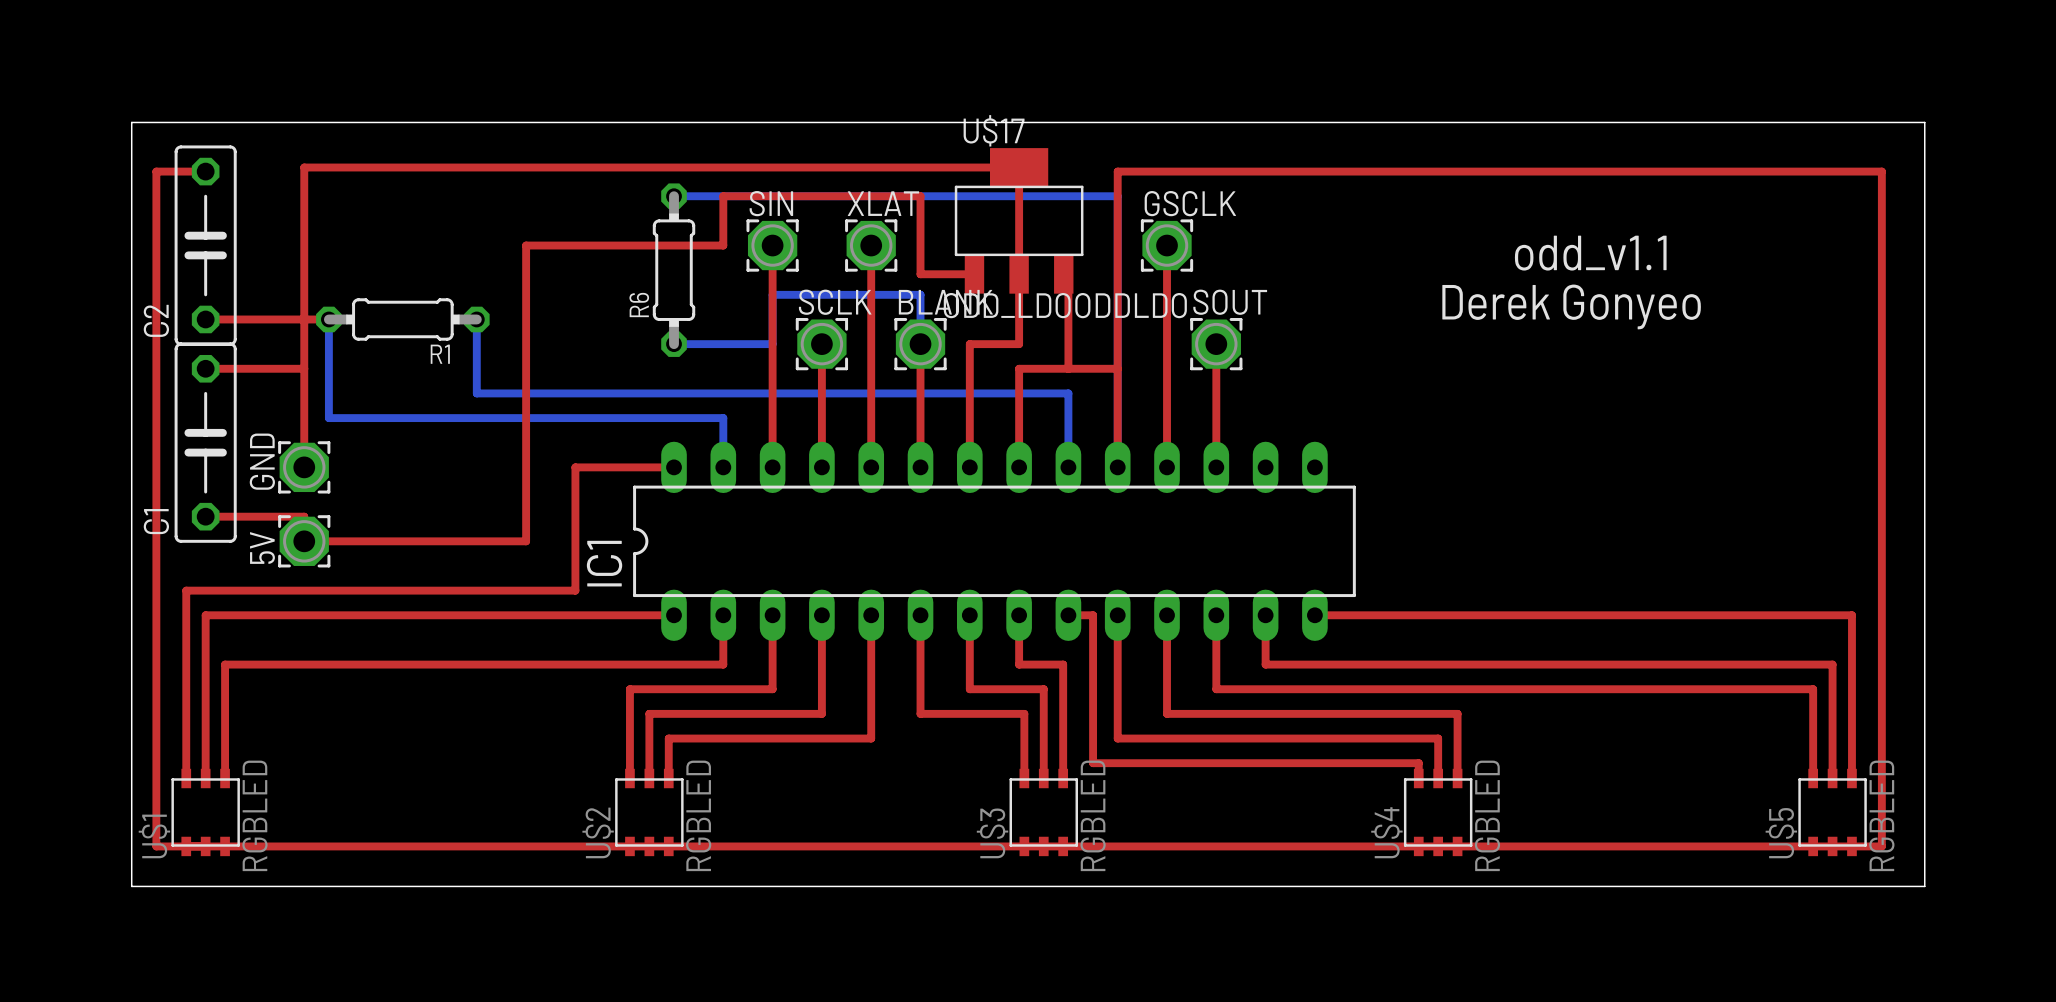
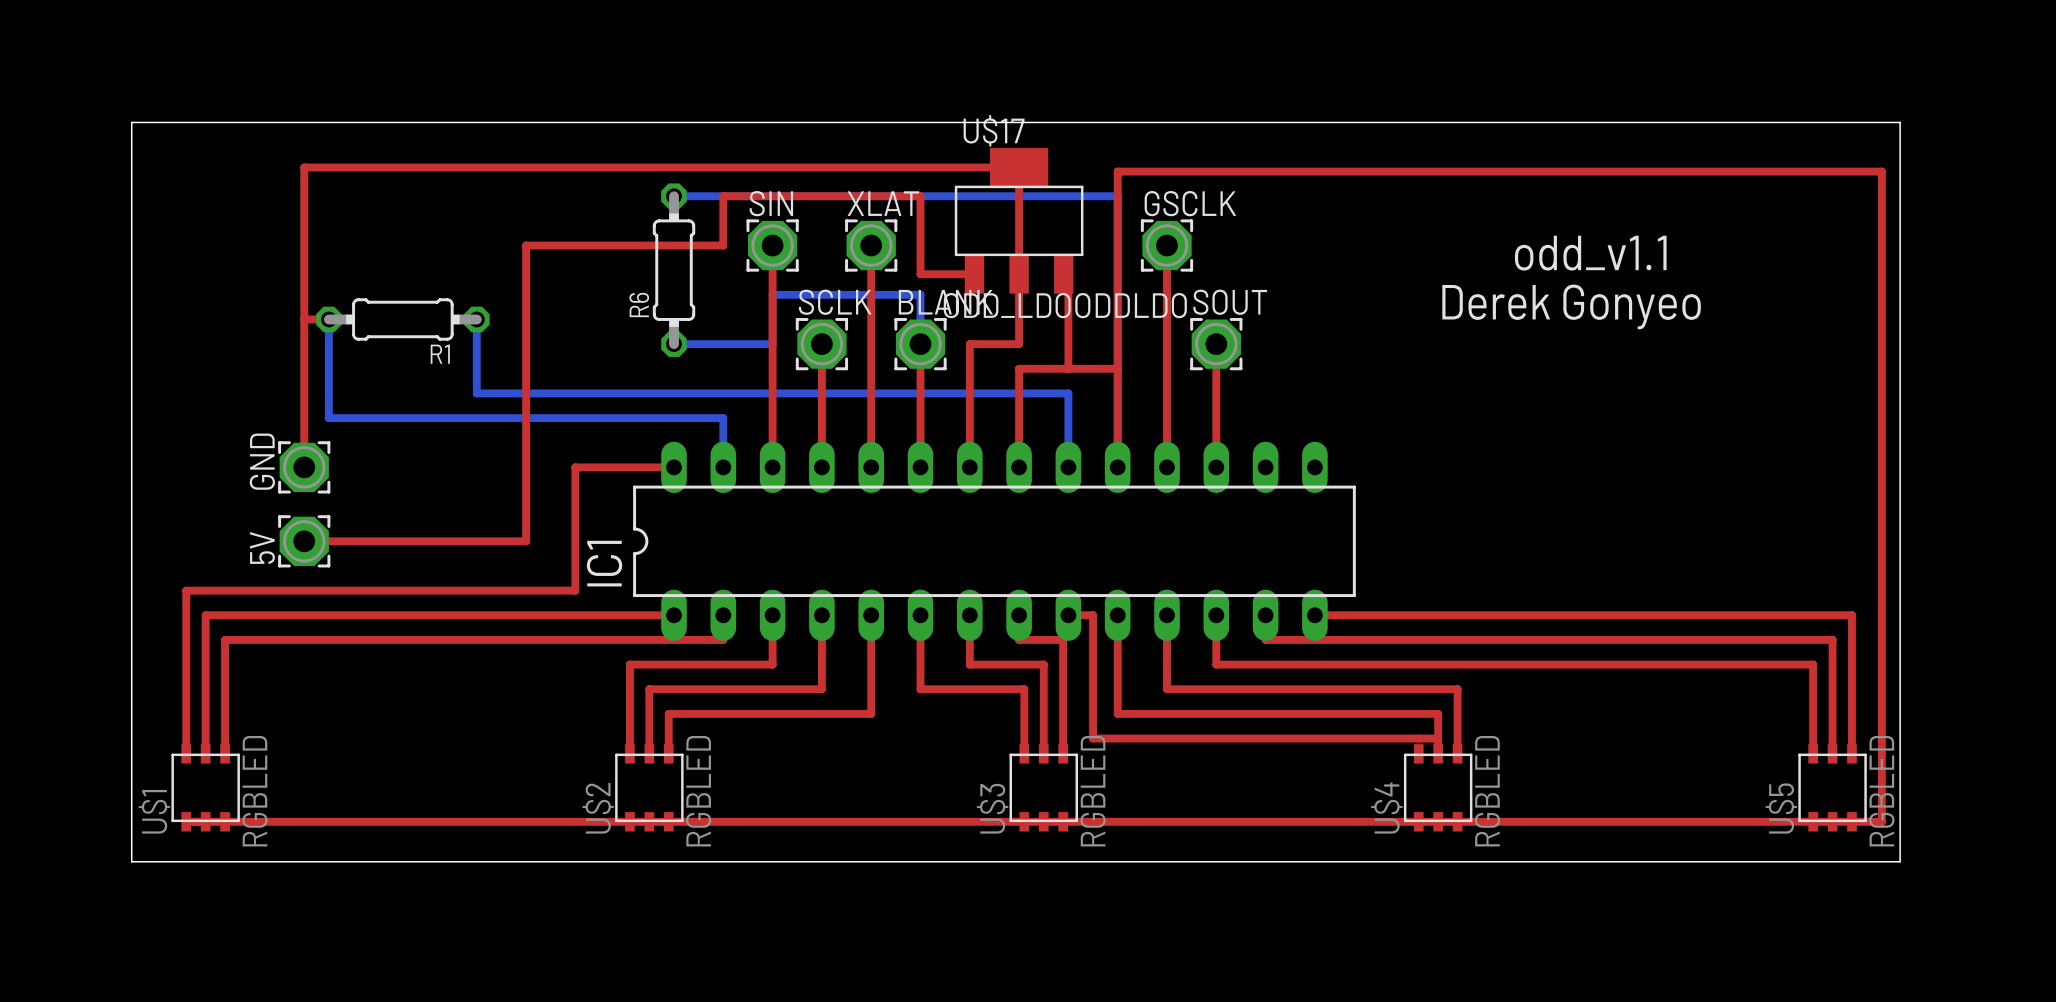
board edge: (1900, 122) (1924, 122) (1924, 886) (131, 886) (131, 861) -> (1900, 122) (1900, 861) (131, 861)
top track: (205, 171) (156, 171) (156, 846) (1881, 846) (1881, 821) -> (186, 821) (1881, 821)
C2: (205, 245) -> none
top track: (205, 319) (304, 319) -> none
top track: (205, 368) (304, 368) -> none
C1: (205, 442) -> none
top track: (205, 516) (304, 516) (304, 541) -> none
top track: (723, 639) (723, 664) -> none
top track: (1019, 639) (1019, 664) -> (1019, 639) (1063, 639) (1063, 664)
top track: (1265, 639) (1265, 664) -> (1265, 639) (1832, 639) (1832, 664)
top track: (225, 664) (629, 664) -> (225, 664) (225, 639) (723, 639)
top track: (772, 664) (772, 689) -> (772, 664) (723, 664)
top track: (969, 664) (969, 689) -> (969, 664) (1019, 664)
top track: (1043, 664) (1063, 664) -> (1043, 664) (1043, 689)
top track: (1216, 664) (1216, 689) -> (1216, 664) (1265, 664)
top track: (1813, 664) (1832, 664) -> (1813, 664) (1813, 689)
top track: (629, 689) (649, 689) -> (629, 689) (629, 664)
top track: (821, 689) (821, 713) -> (821, 689) (772, 689)
top track: (920, 689) (920, 713) (1024, 713) -> (920, 689) (969, 689)
top track: (1024, 689) (1043, 689) -> (1024, 689) (1024, 713)
top track: (1167, 689) (1167, 713) -> (1167, 689) (1216, 689)
top track: (1457, 689) (1813, 689) -> none
top track: (649, 713) (668, 713) -> (649, 713) (649, 689)
top track: (871, 713) (871, 738) (668, 738) -> (871, 713) (821, 713)
top track: (1117, 713) (1117, 738) -> (1093, 738) (1117, 738)
top track: none -> (1117, 713) (1167, 713)
top track: (1438, 713) (1457, 713) -> (1457, 689) (1457, 713)
top track: (1093, 738) (1093, 763) (1418, 763) (1418, 778) -> none
top track: (186, 753) (186, 778) -> none
top track: (205, 753) (205, 778) -> none
top track: (225, 753) (225, 778) -> none
top track: (629, 753) (629, 778) -> none
top track: (649, 753) (649, 778) -> none
top track: (668, 753) (668, 778) -> (668, 713) (668, 738)
top track: (1024, 753) (1024, 778) -> none
top track: (1043, 753) (1043, 778) -> none
top track: (1063, 753) (1063, 778) -> none
top track: (1438, 753) (1438, 778) -> (1438, 713) (1438, 738)
top track: (1457, 753) (1457, 778) -> none
top track: (1813, 753) (1813, 778) -> none
top track: (1832, 753) (1832, 778) -> none
top track: (1851, 753) (1851, 778) -> none
U$1 position: (205, 812) -> (205, 787)
U$2 position: (649, 812) -> (649, 787)
U$3 position: (1043, 812) -> (1043, 787)
U$4 position: (1438, 812) -> (1438, 787)
U$5 position: (1832, 812) -> (1832, 787)

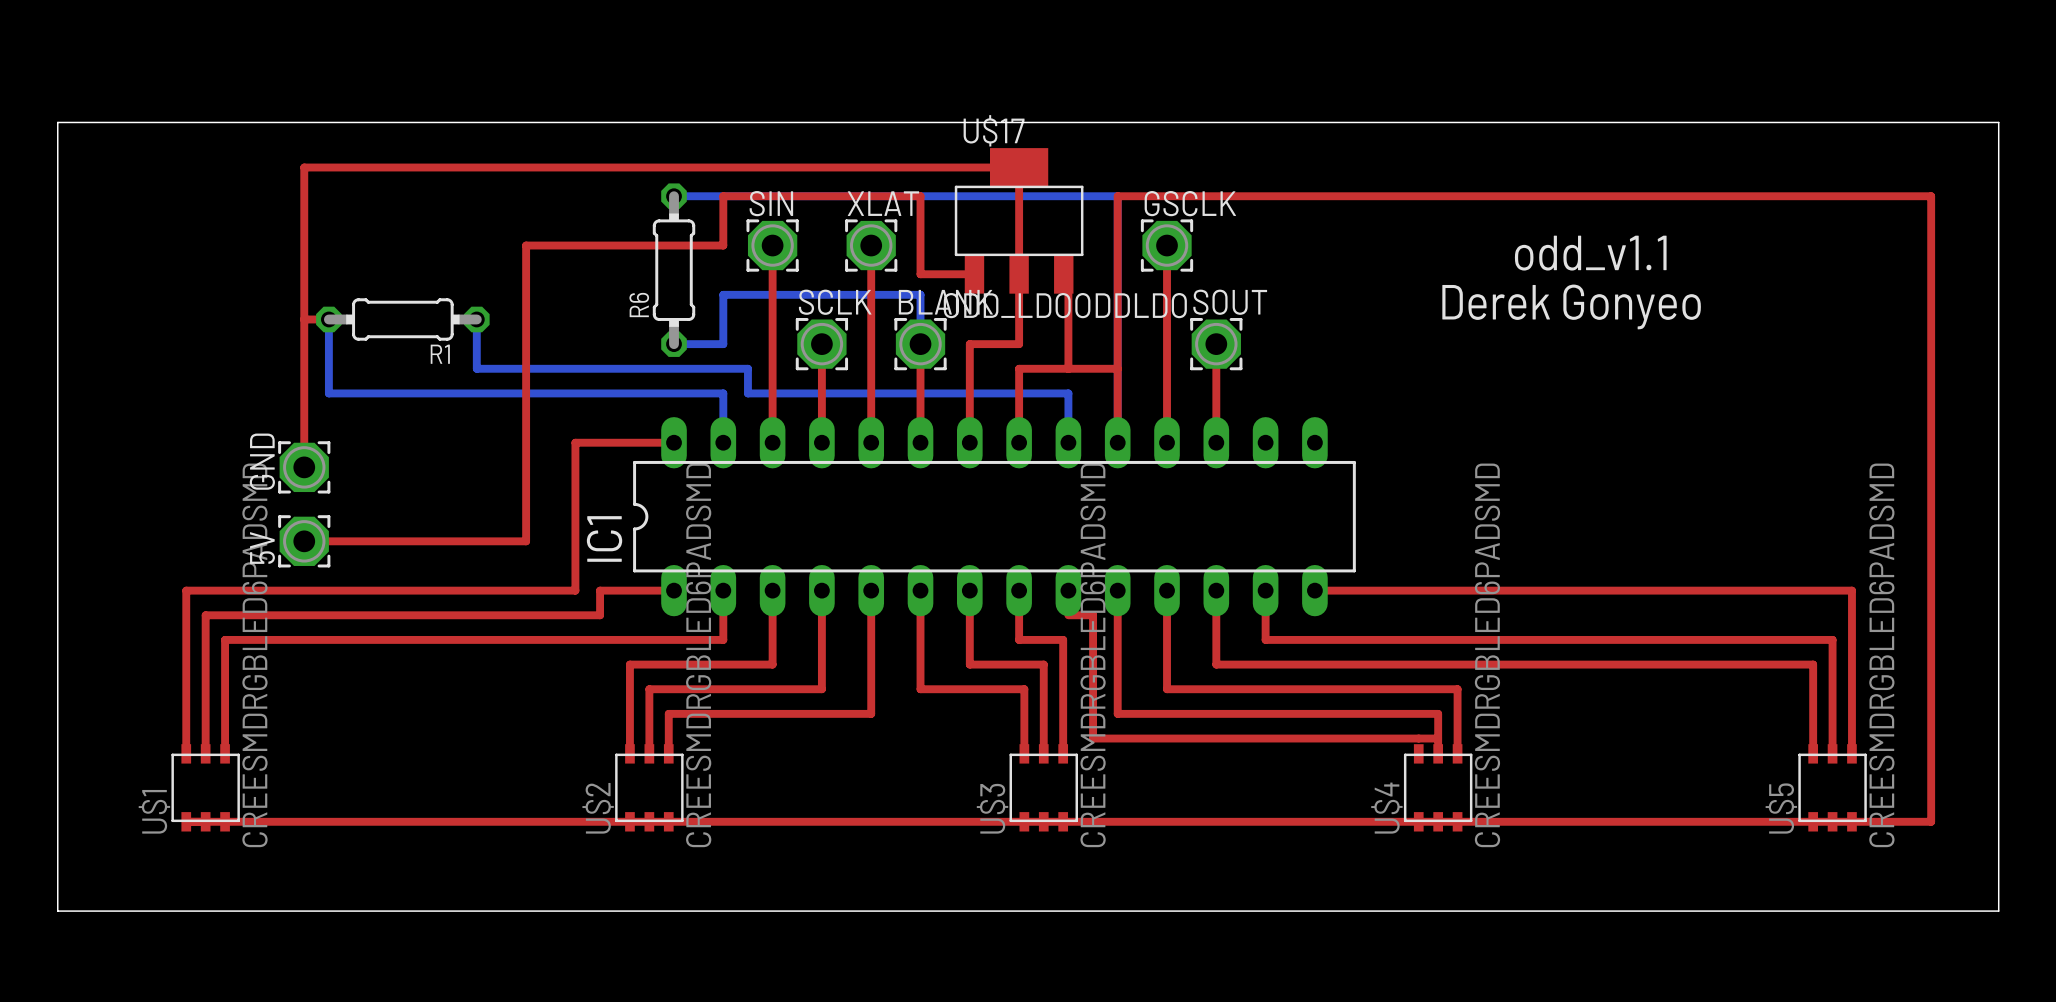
board edge: (131, 122) (131, 861) (1900, 861) (1900, 122) -> (131, 122) (57, 122) (57, 911) (1998, 911) (1998, 122) (1900, 122)
top track: (1117, 196) (1117, 171) (1881, 171) (1881, 821) -> (1117, 196) (1931, 196) (1931, 821) (1881, 821)
bottom track: (772, 294) (772, 344) (723, 344) -> (772, 294) (723, 294) (723, 344)
bottom track: (476, 368) (476, 393) -> (328, 393) (476, 393)
bottom track: none -> (476, 368) (747, 368) (747, 393)
bottom track: (328, 393) (328, 418) (723, 418) -> none
bottom track: (723, 393) (747, 393) -> (723, 393) (723, 418)
top track: (575, 467) (674, 467) -> (575, 467) (575, 442) (674, 442)
IC1 position: (994, 541) -> (994, 516)
top track: (600, 615) (674, 615) -> (600, 615) (600, 590) (674, 590)
top track: (1314, 615) (1851, 615) -> (1314, 590) (1851, 590) (1851, 615)
U$1 value: RGBLED (254, 791) -> CREESMDRGBLED6PADSMD (254, 655)
U$2 value: RGBLED (698, 791) -> CREESMDRGBLED6PADSMD (698, 655)
U$3 value: RGBLED (1093, 791) -> CREESMDRGBLED6PADSMD (1093, 655)
U$4 value: RGBLED (1487, 791) -> CREESMDRGBLED6PADSMD (1487, 655)
U$5 value: RGBLED (1881, 791) -> CREESMDRGBLED6PADSMD (1881, 655)

